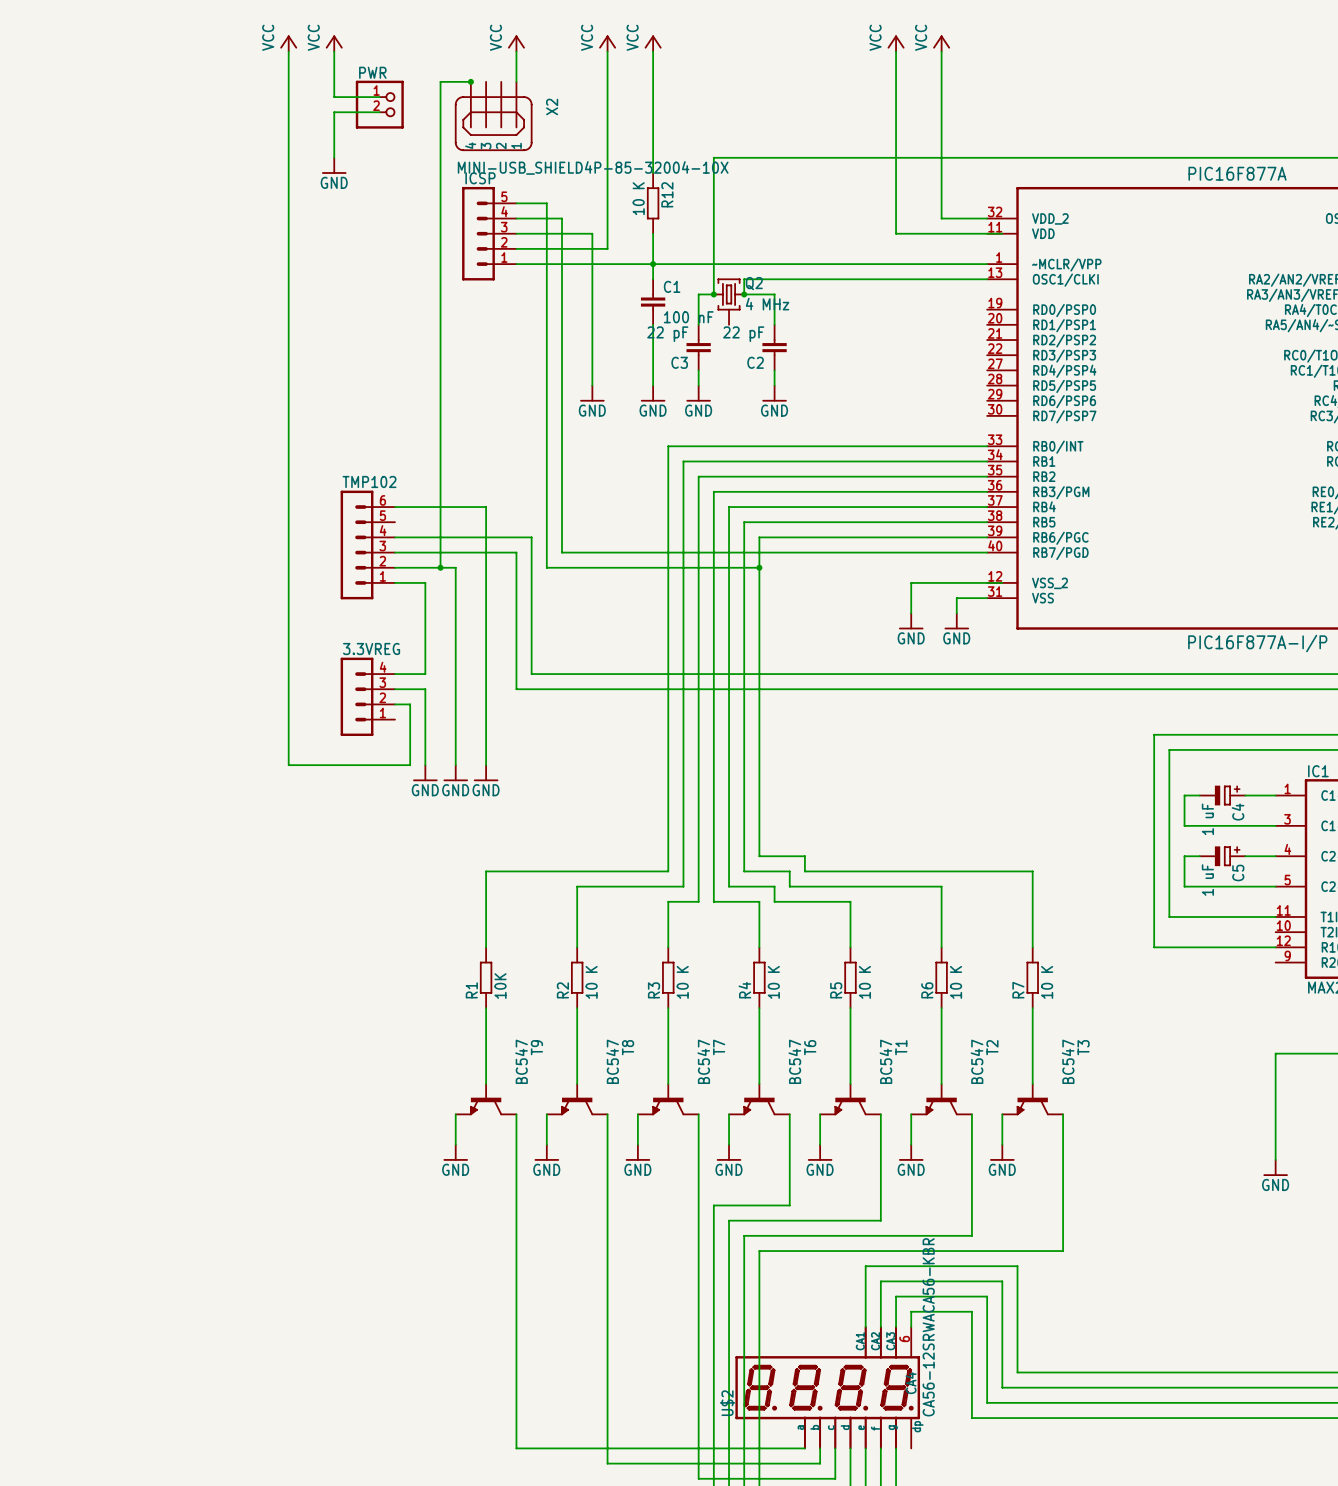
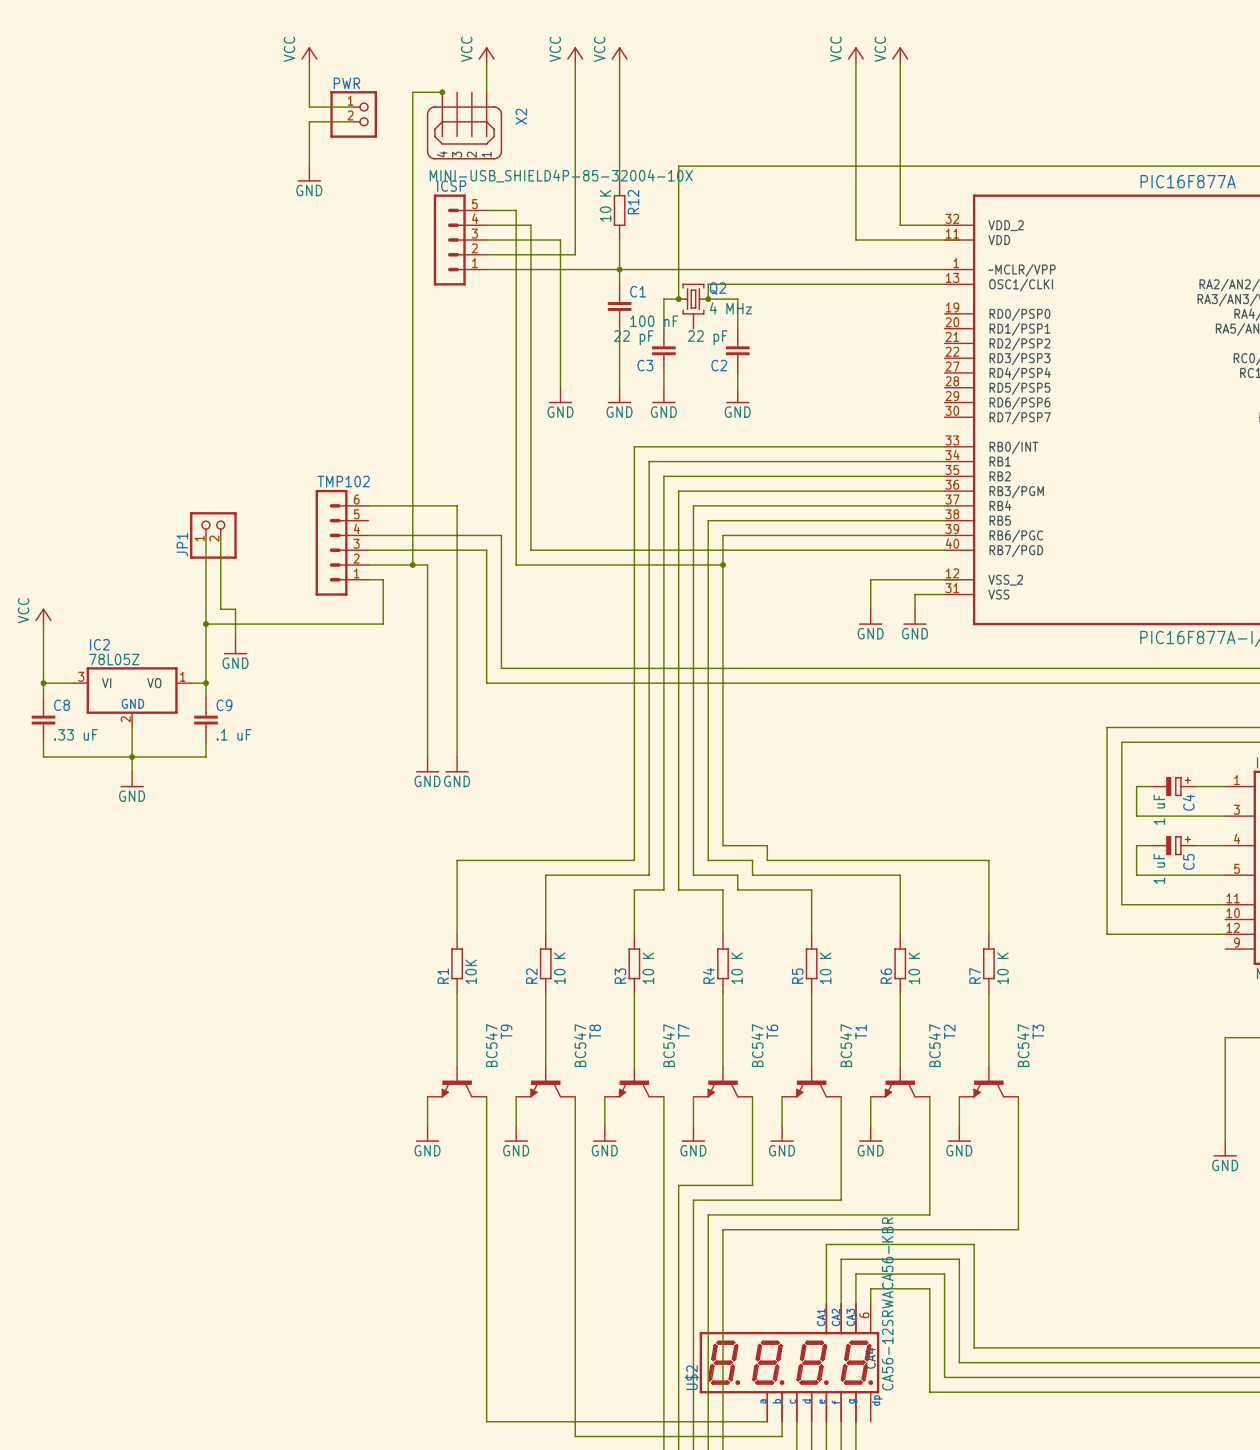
power symbol: VCC (288, 43) -> none
wire: (288, 51) (288, 765) (410, 765) (410, 704) (394, 704) -> none
wire: none -> (205, 535) (205, 697)
JP1: none -> (213, 535)
wire: none -> (220, 535) (220, 609) (235, 609) (235, 638)
wire: (410, 582) (425, 582) (425, 674) (394, 674) -> (383, 579) (383, 624) (205, 624)
power symbol: none -> VCC (43, 616)
wire: none -> (43, 624) (43, 697)
junction: none -> (205, 624)
power symbol: none -> GND (235, 646)
wire: none -> (43, 683) (73, 683)
junction: none -> (43, 683)
wire: none -> (191, 683) (205, 683)
junction: none -> (205, 683)
wire: (394, 689) (425, 689) (425, 765) -> none
3.3VREG: (367, 696) -> none
IC2: none -> 78L05Z (132, 697)
C8: none -> .33 uF (43, 720)
C9: none -> .1 uF (205, 720)
wire: none -> (132, 727) (132, 771)
wire: none -> (43, 742) (43, 757) (205, 757) (205, 742)
junction: none -> (132, 757)
power symbol: GND (425, 773) -> none
power symbol: none -> GND (132, 779)

